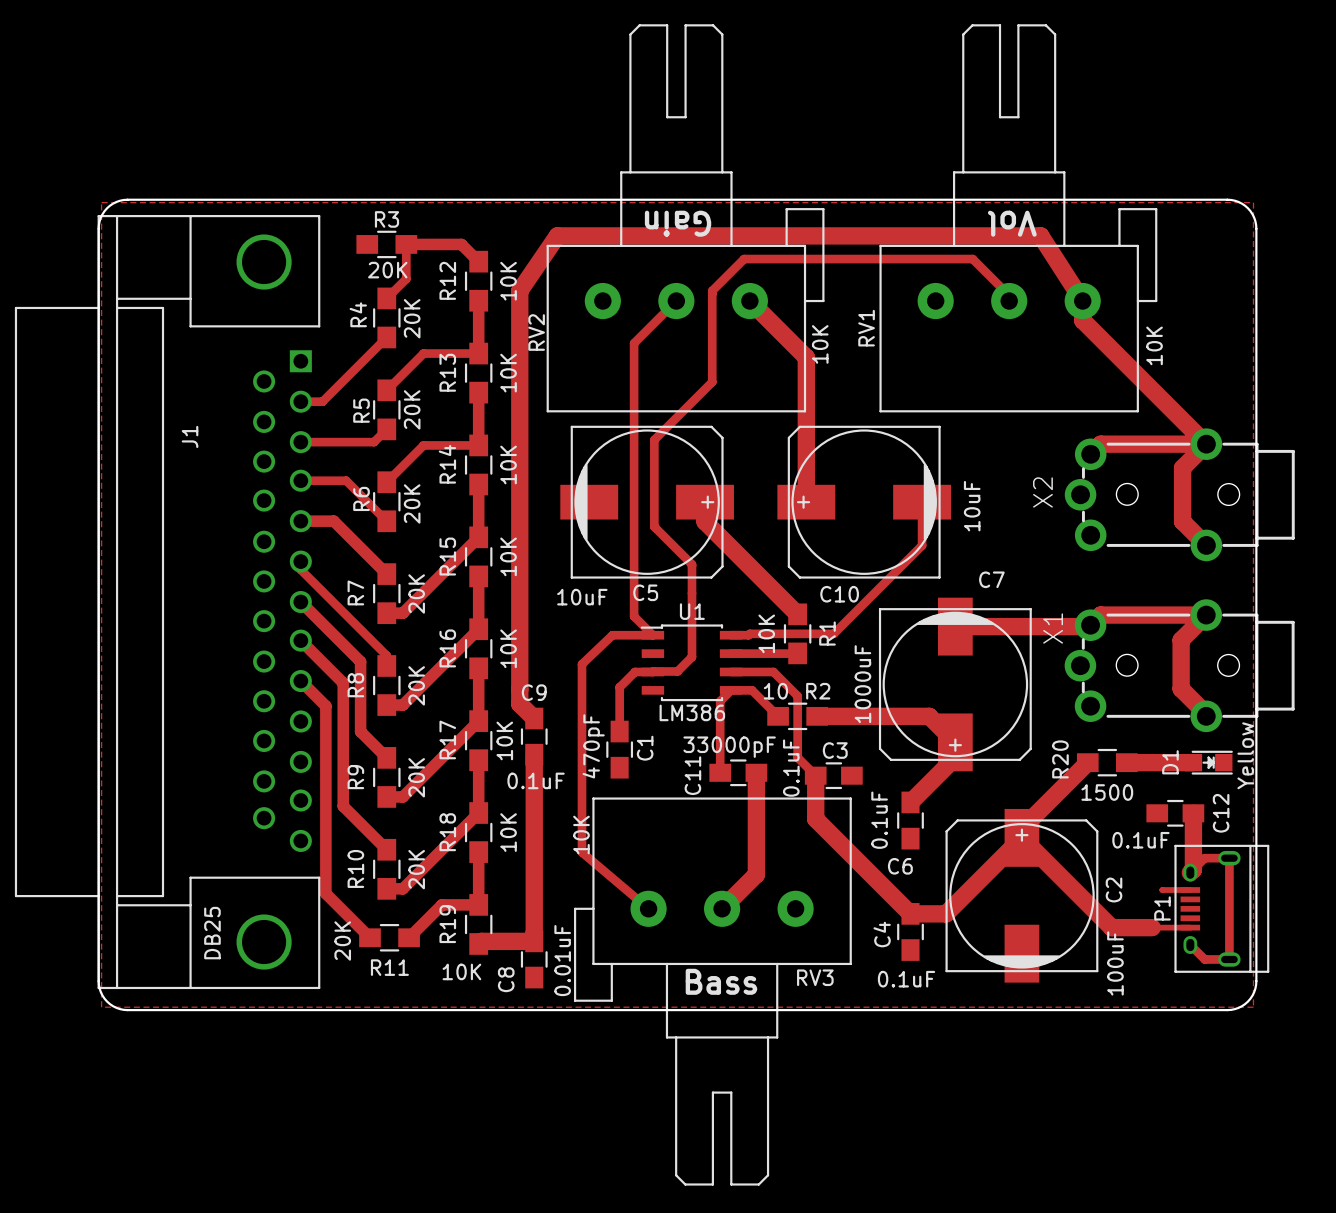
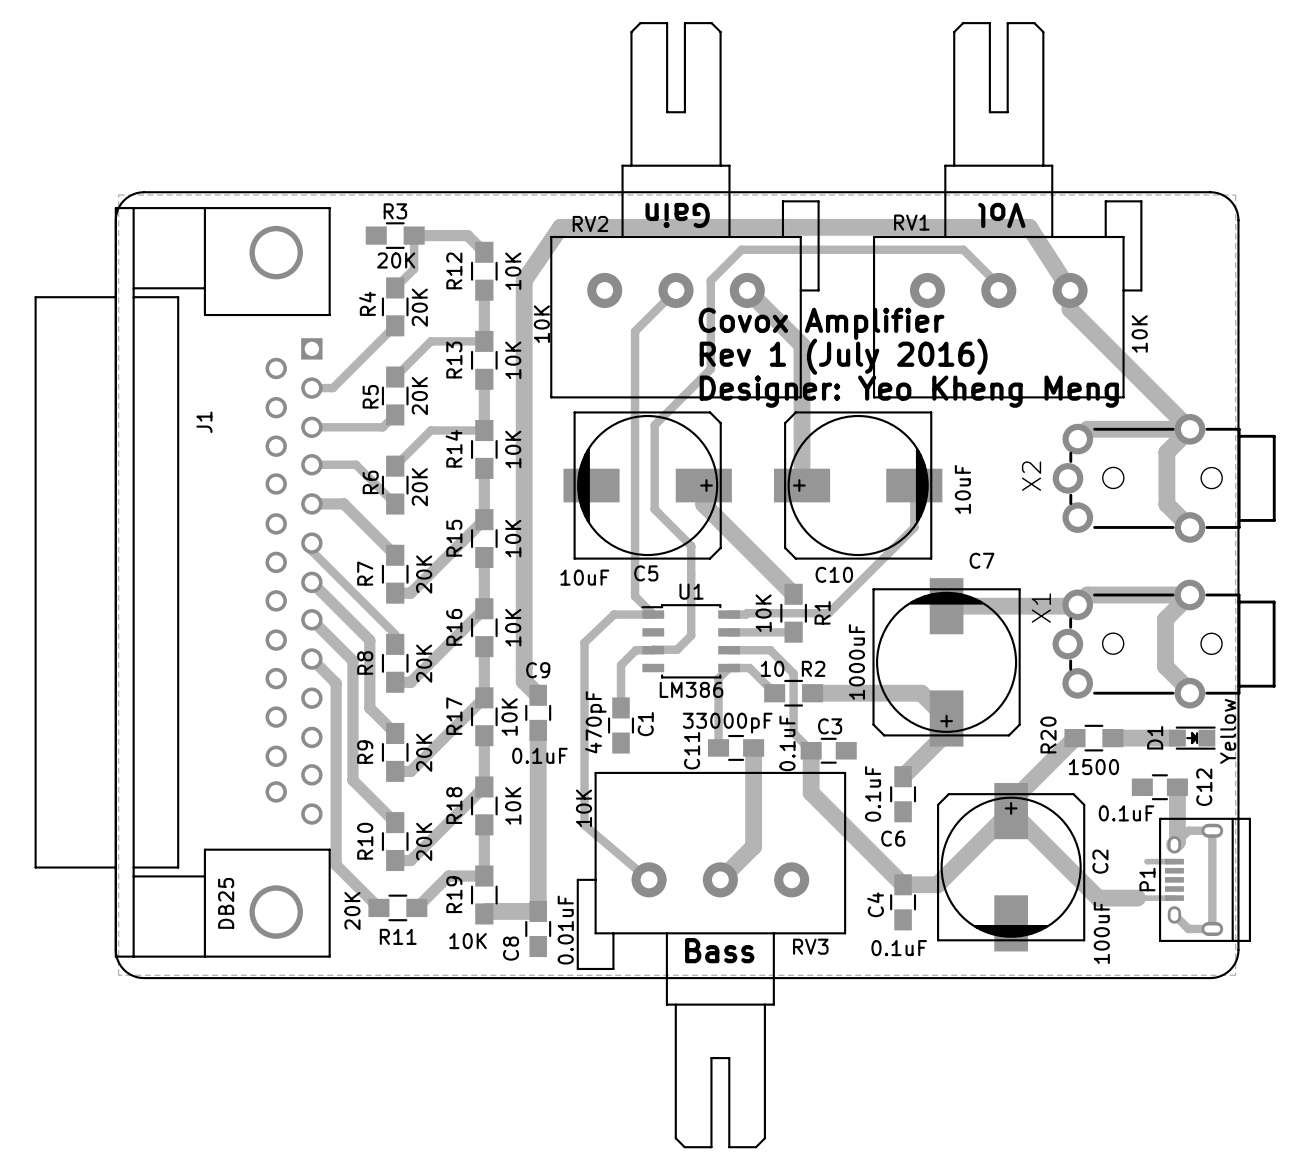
RV1 name rotation: 0° (866, 328) -> 90° clockwise (911, 222)
RV1 name position: RV1 (866, 328) -> RV1 (911, 222)
RV2 name rotation: 0° (536, 332) -> 90° clockwise (590, 223)
RV2 name position: RV2 (536, 332) -> RV2 (590, 223)
text: none -> Covox Amplifier (821, 323)
RV2 value position: 10K (820, 344) -> 10K (541, 324)
text: none -> Rev 1 (July 2016) (843, 356)
text: none -> Designer: Yeo Kheng Meng (909, 391)

